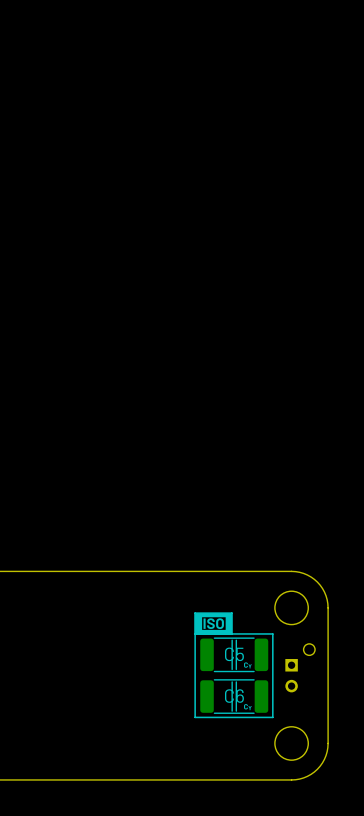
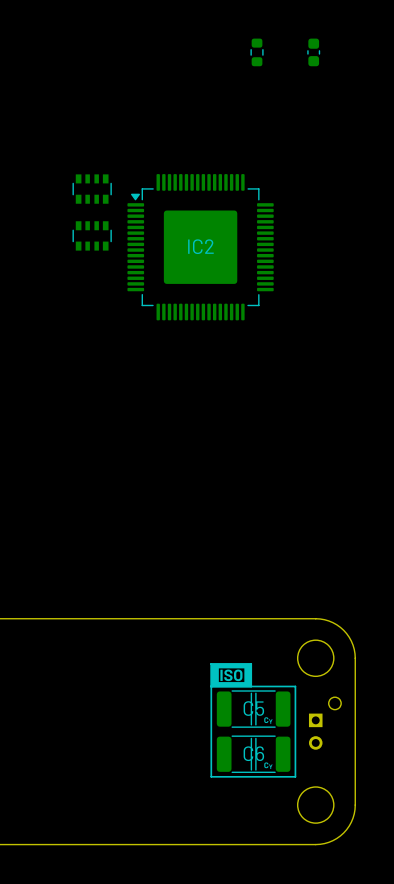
part: none -> (257, 52)
part: none -> (313, 52)
part: none -> (92, 189)
part: none -> (92, 235)
IC2: none -> (200, 247)

